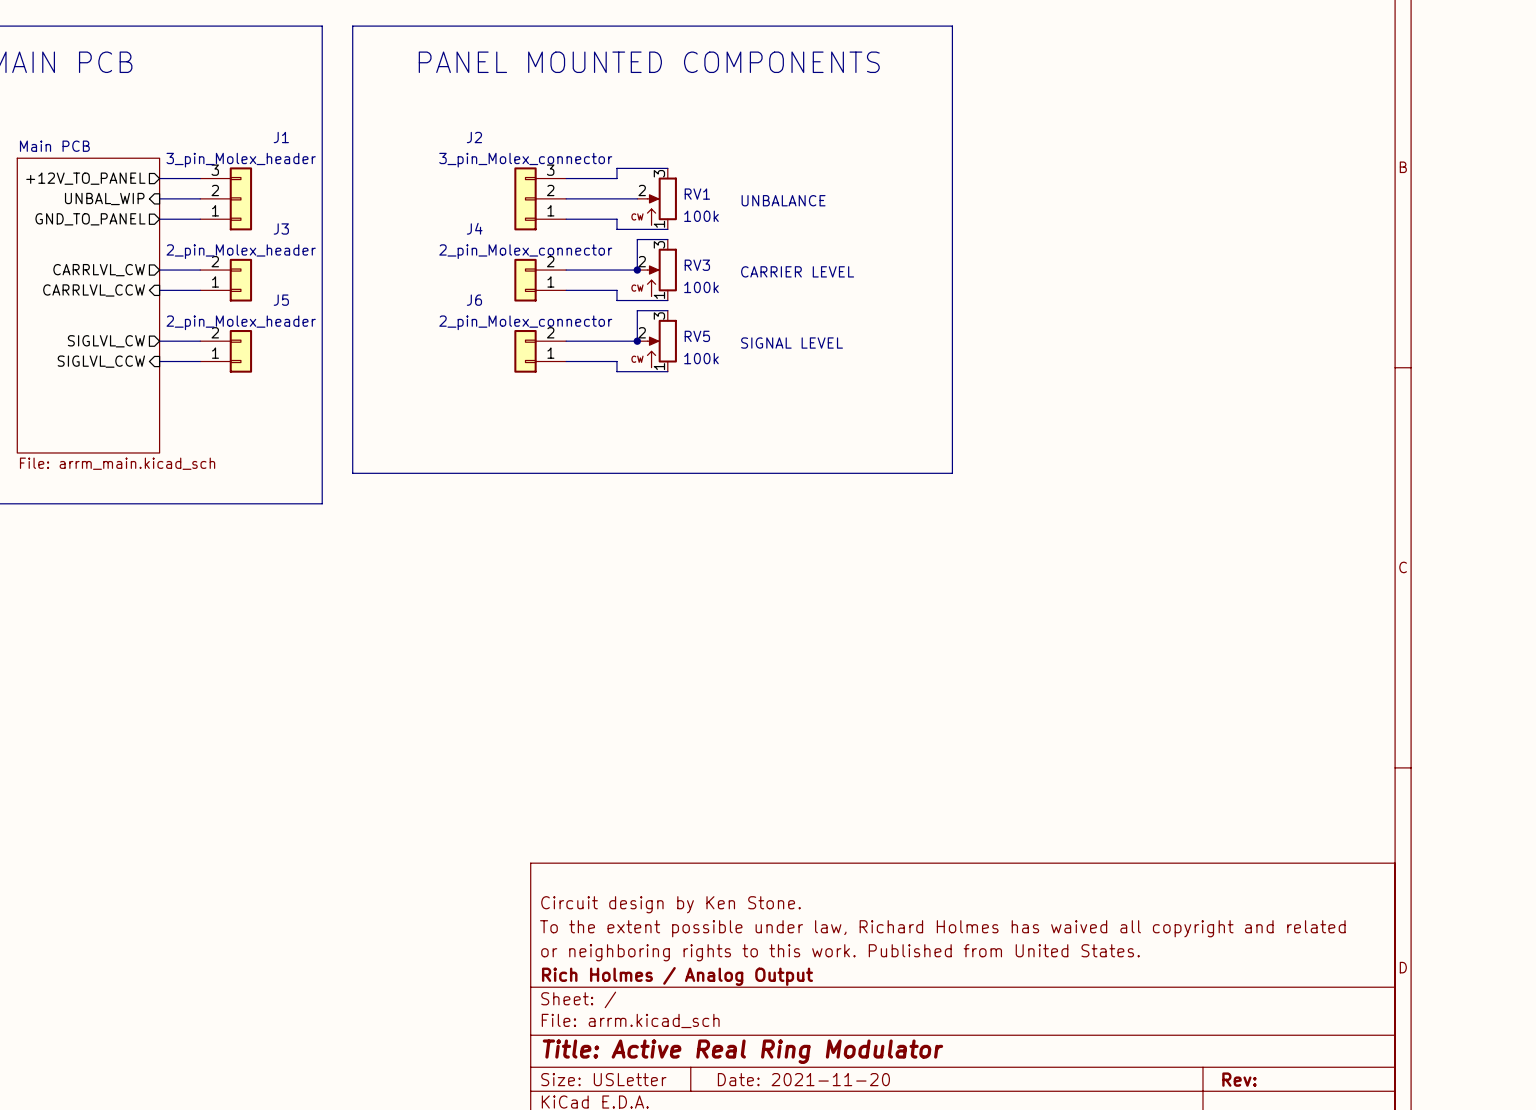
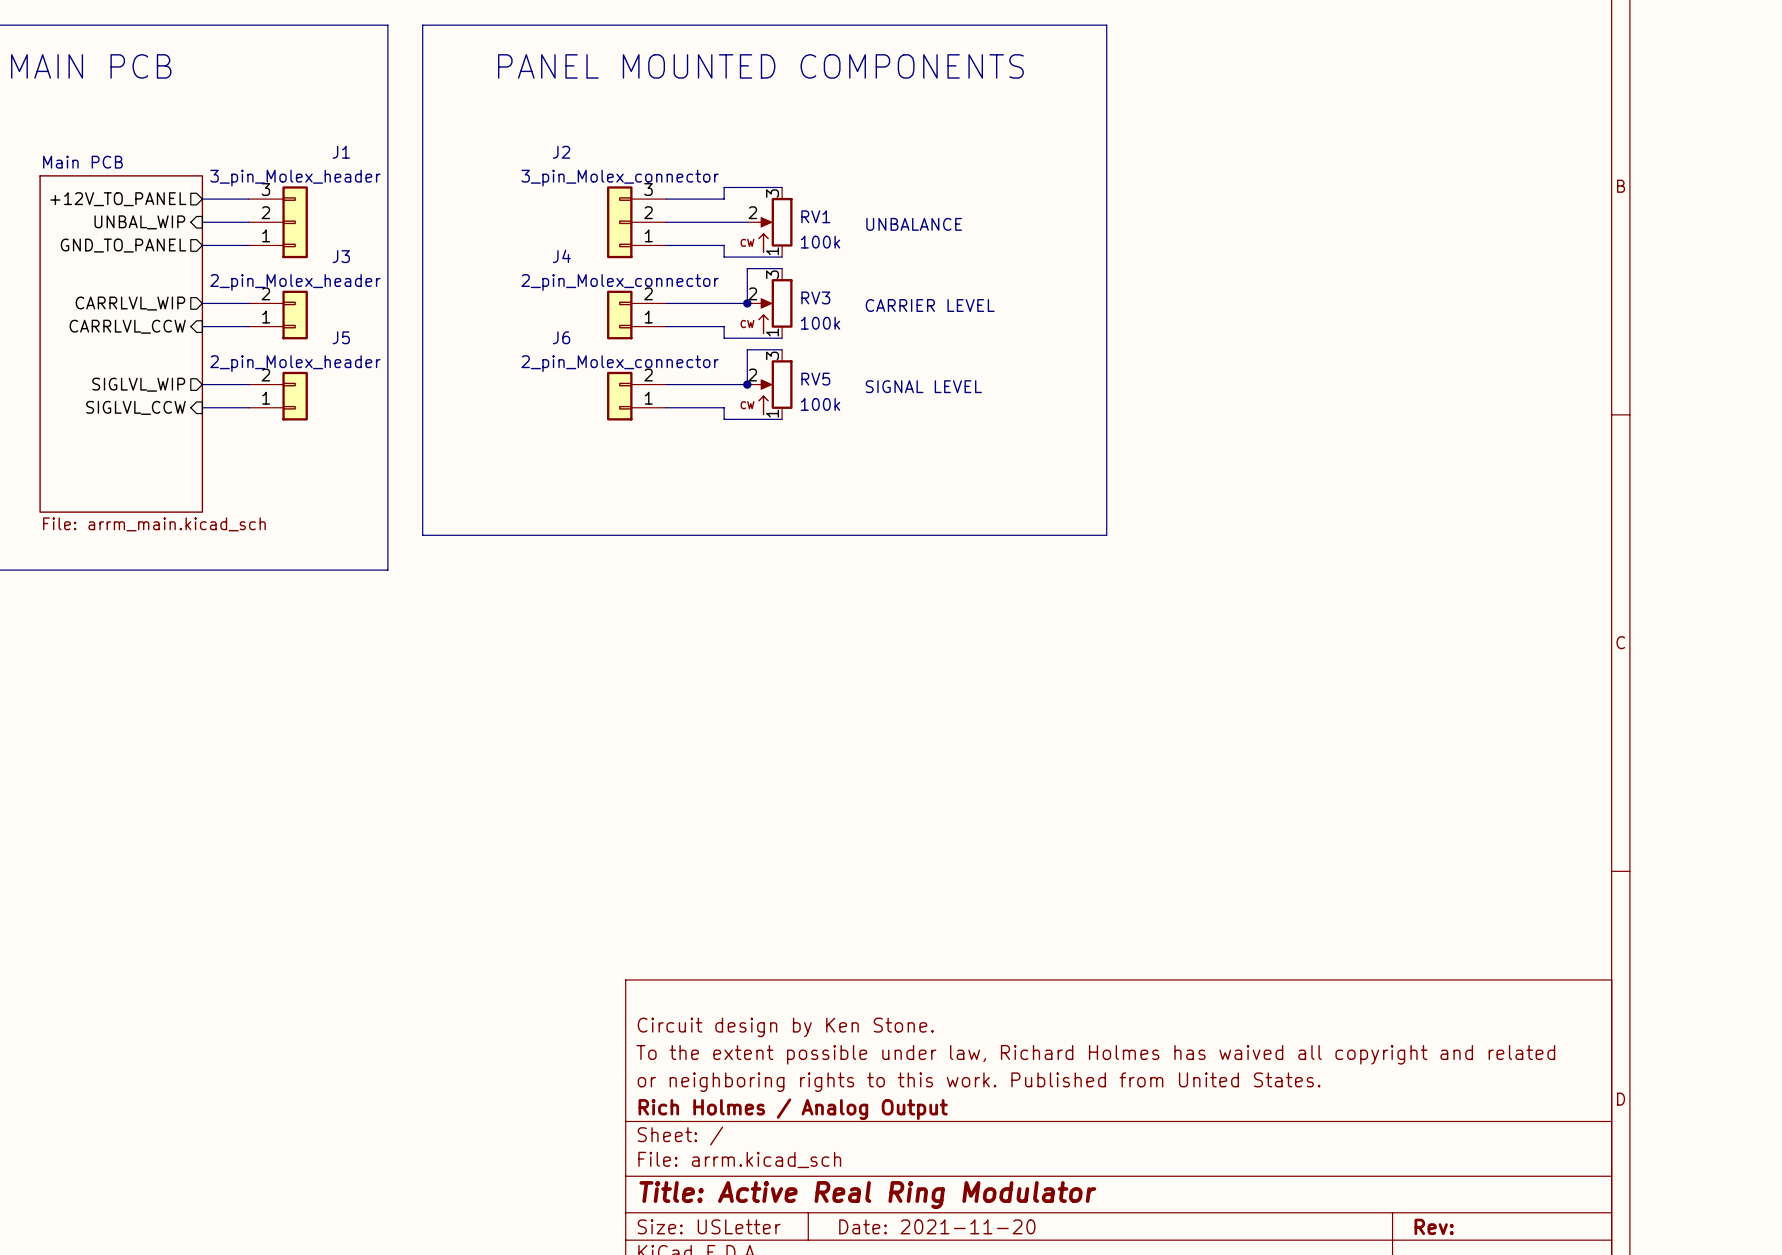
sheet pin: CARRLVL_CW (99, 270) -> CARRLVL_WIP (130, 303)
sheet pin: SIGLVL_CW (106, 341) -> SIGLVL_WIP (138, 384)

